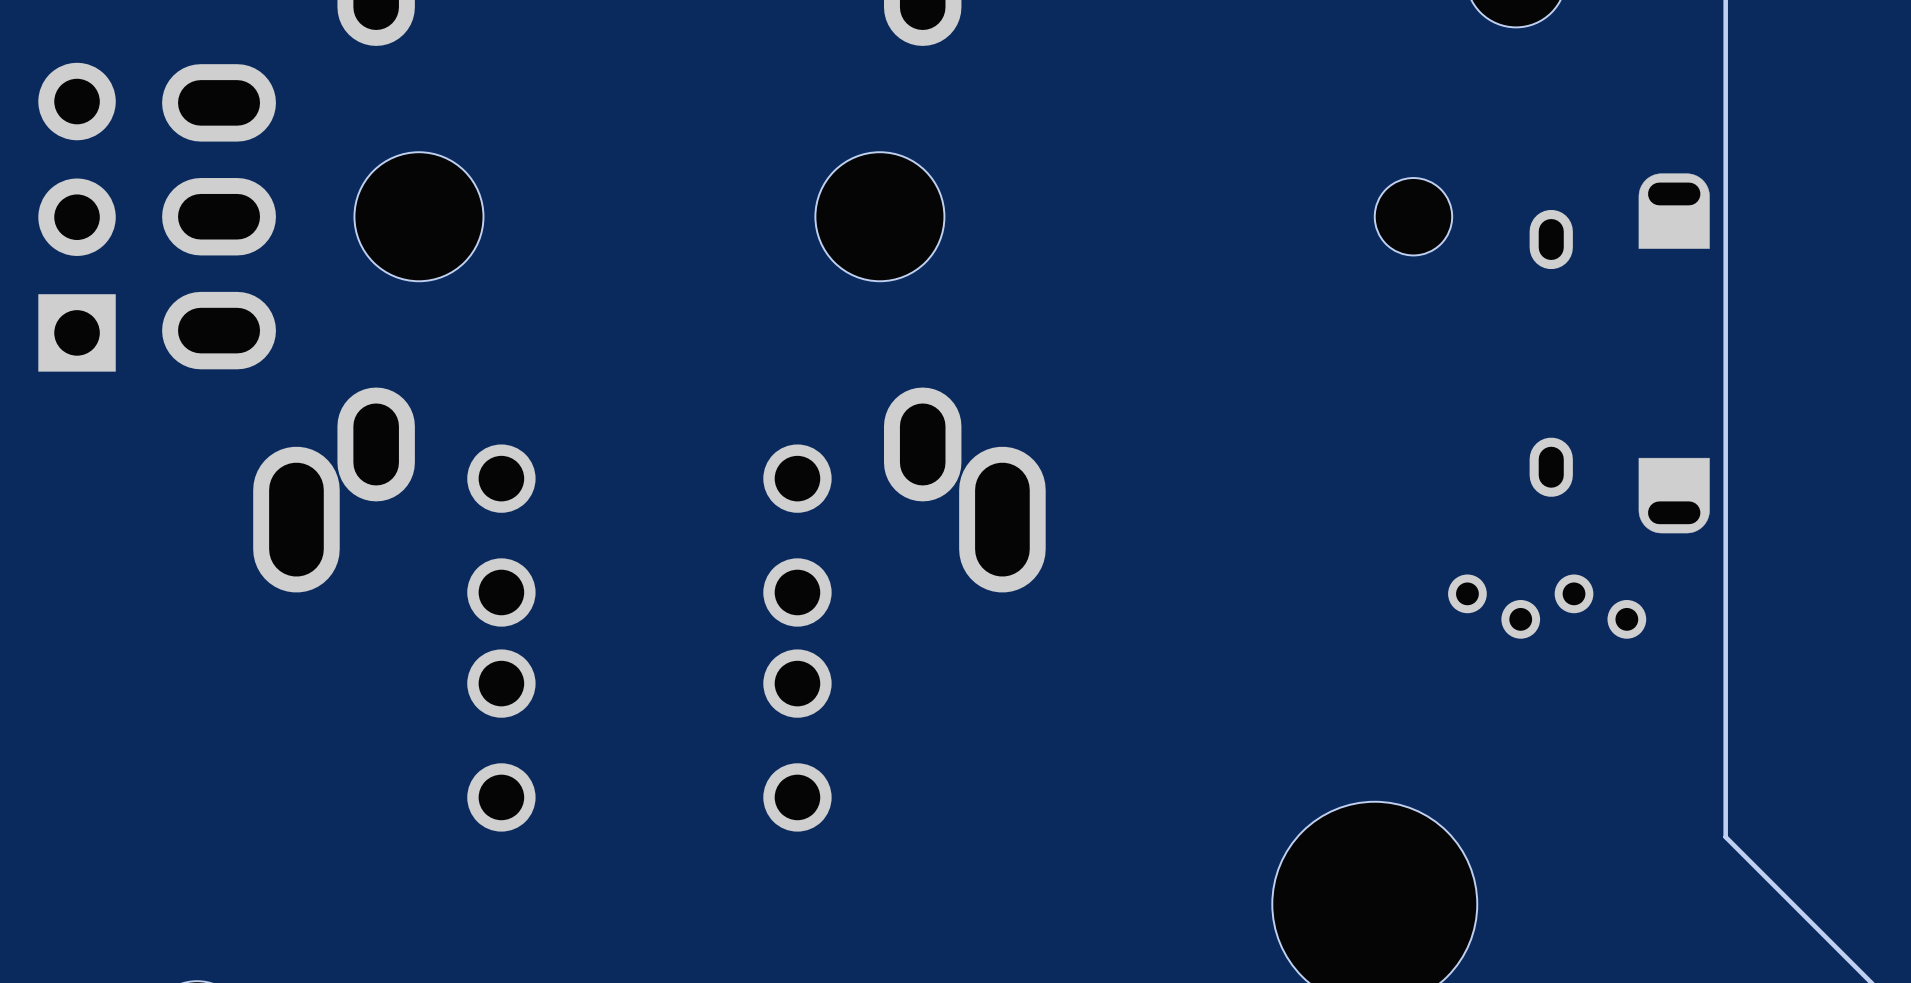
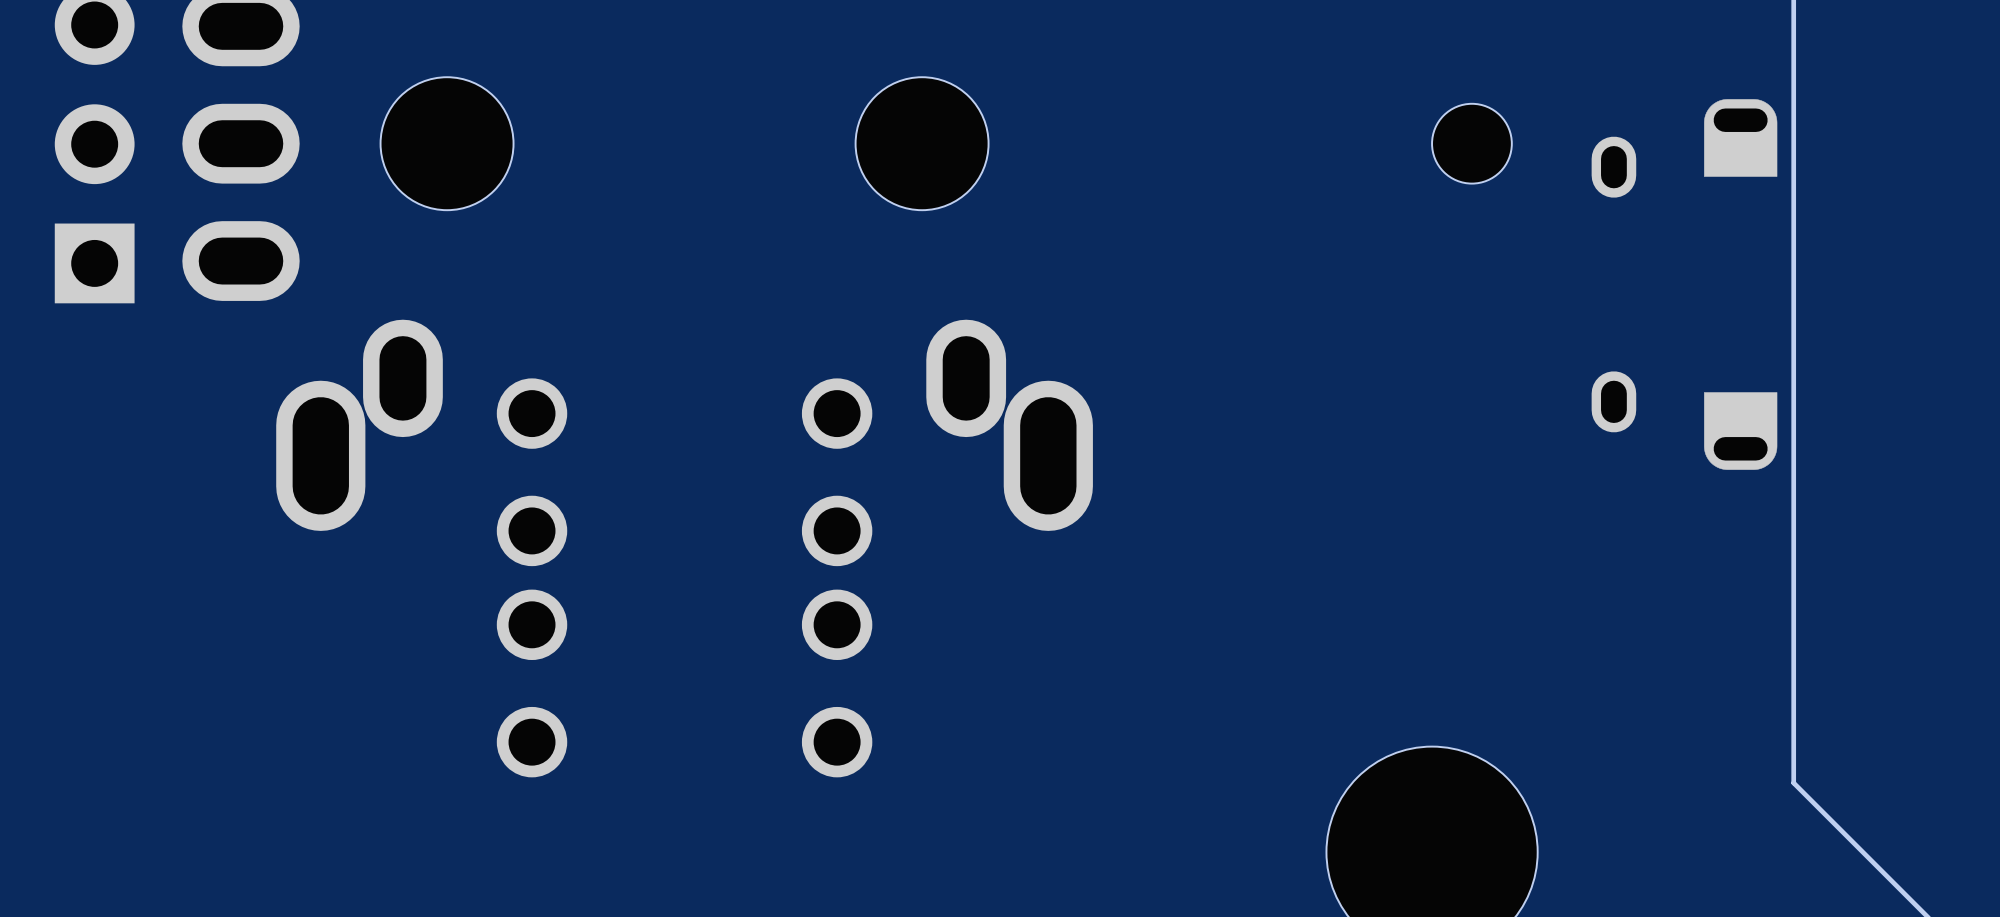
part: (1467, 593) -> none
part: (1574, 593) -> none
part: (1520, 619) -> none
part: (1626, 619) -> none

